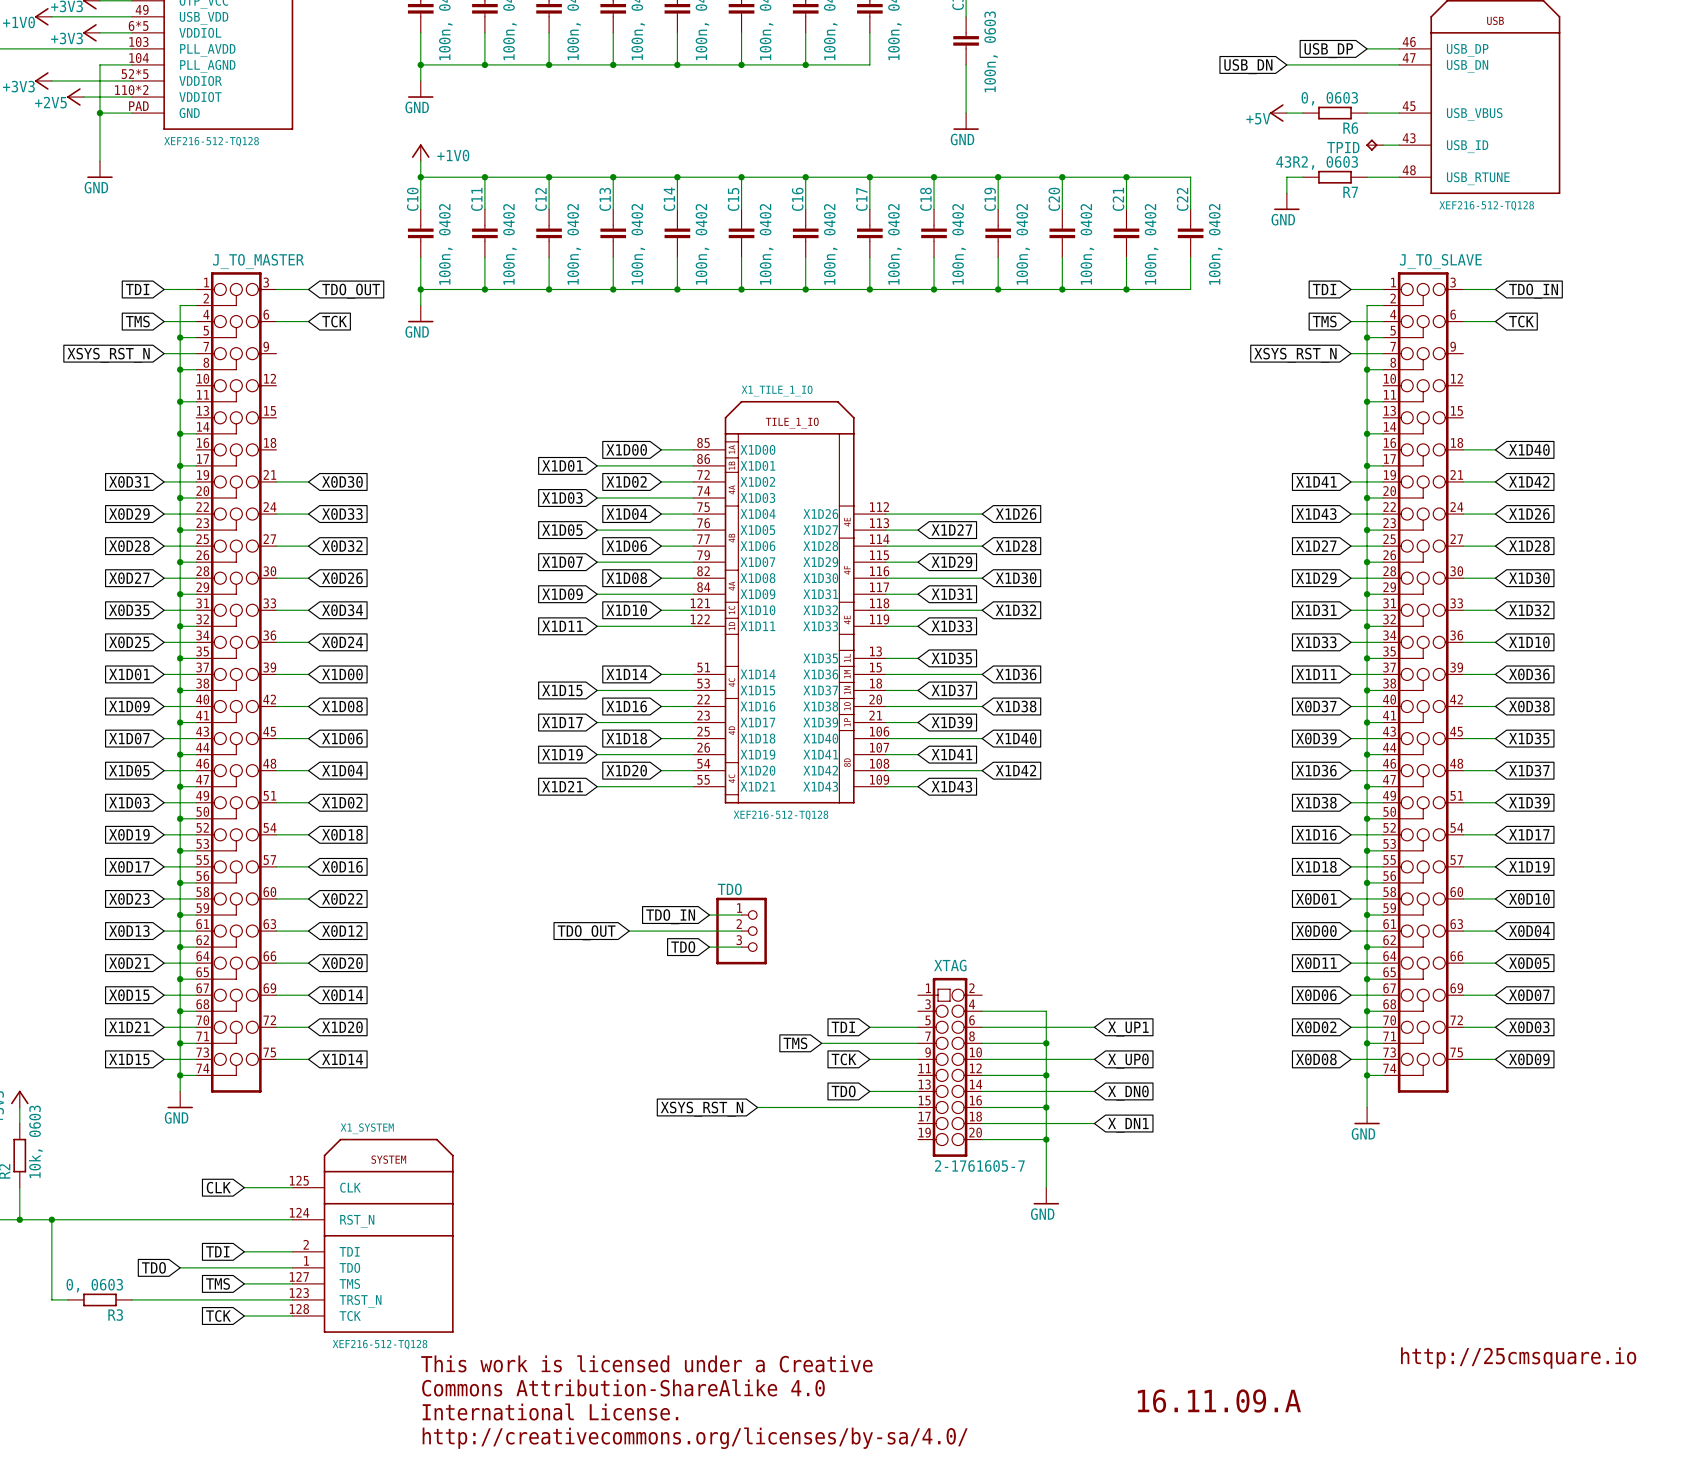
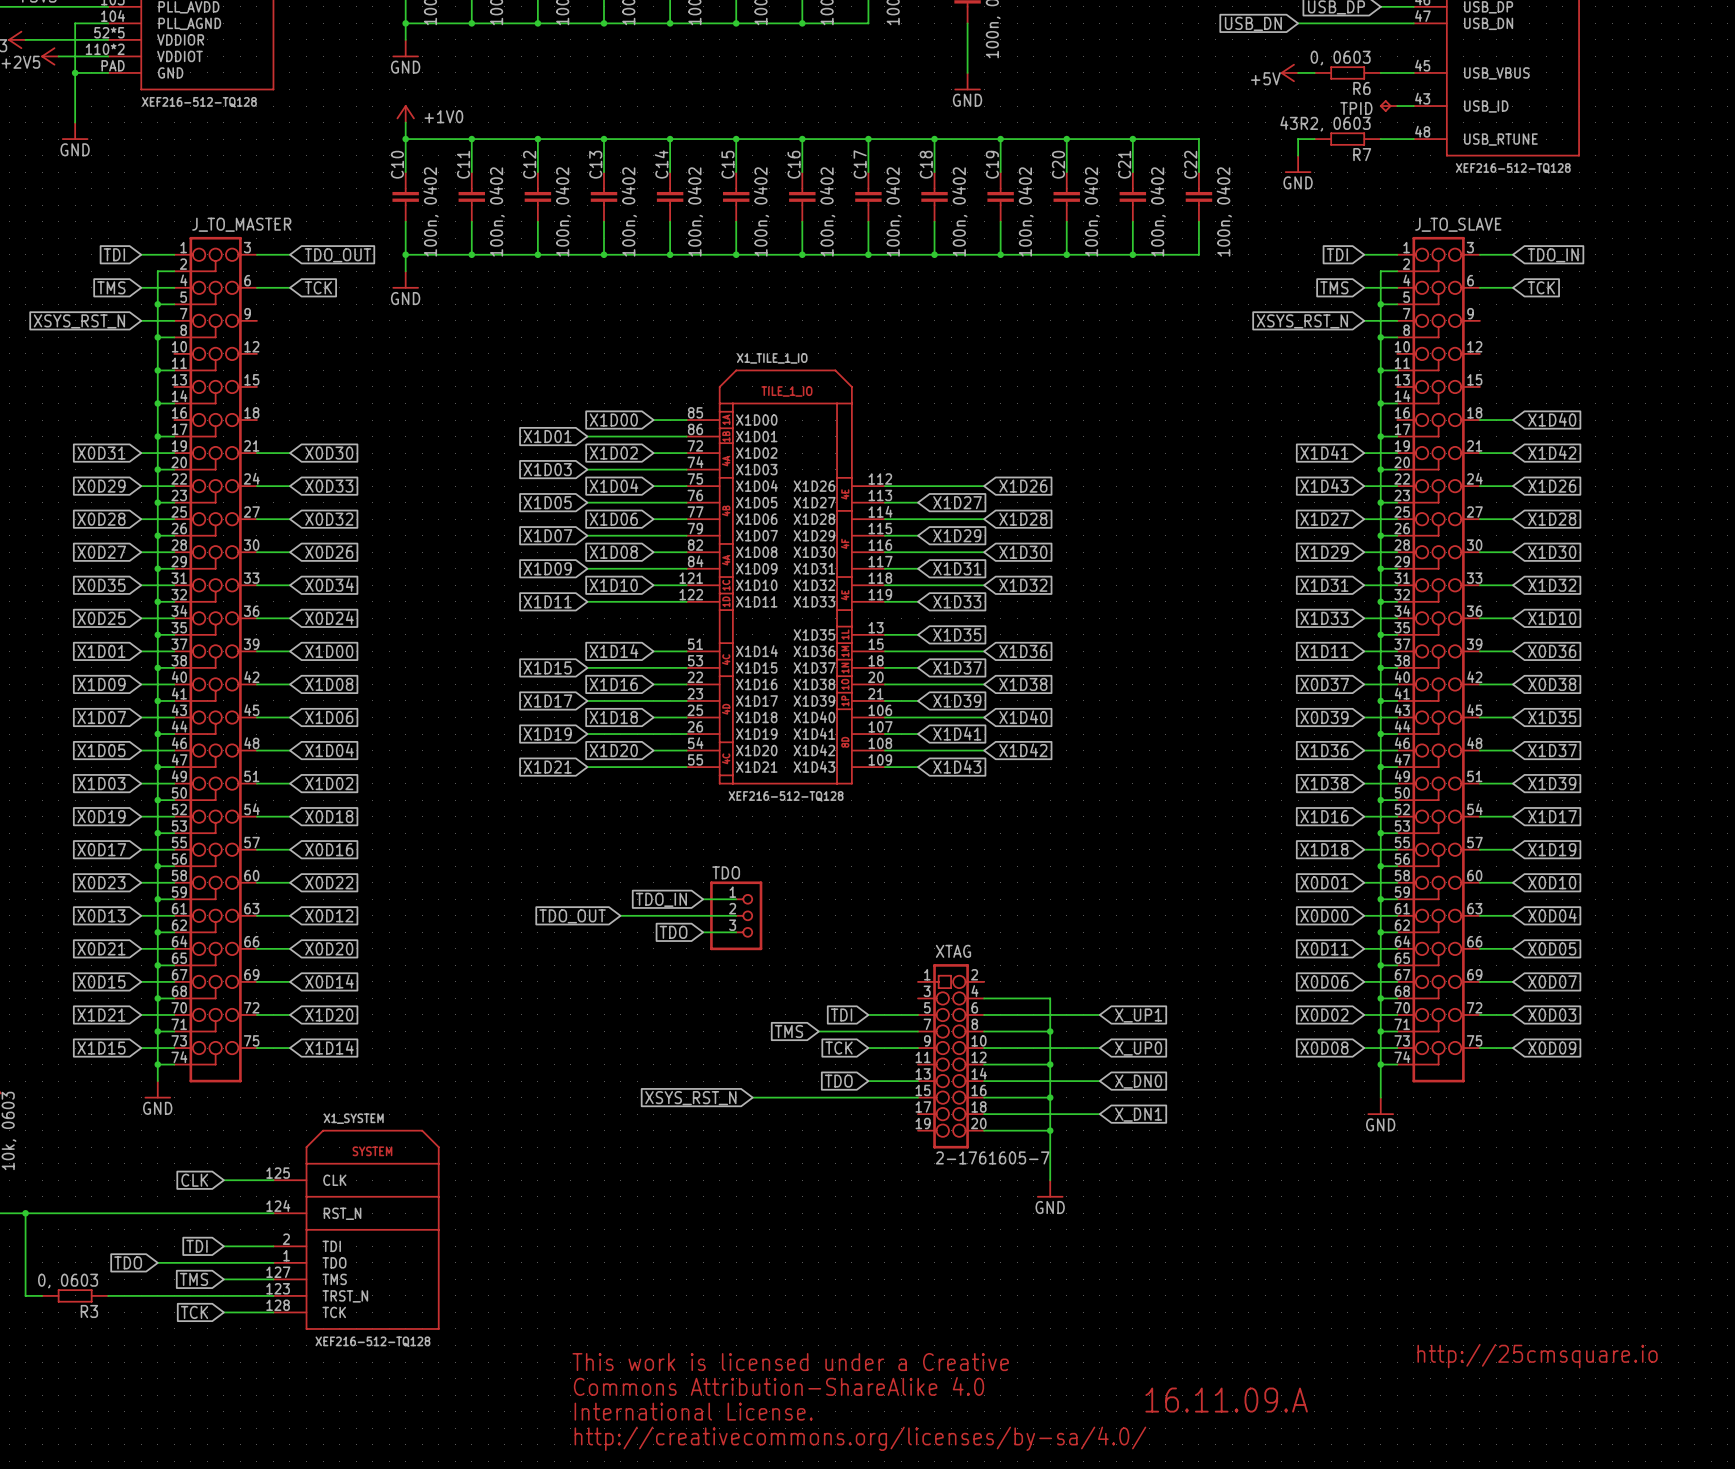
text: This work is licensed under a Creative (646, 1363) -> none
text: none -> This work is licensed under a Creative (790, 1362)
text: Commons Attribution-ShareAlike 4.0 (623, 1387) -> none
text: none -> Commons Attribution-ShareAlike 4.0 (778, 1386)
text: International License. (550, 1411) -> none
text: none -> International License. (693, 1411)
text: http://creativecommons.org/licenses/by-sa/4.0/ (695, 1438) -> none
text: none -> http://creativecommons.org/licenses/by-sa/4.0/ (860, 1438)

